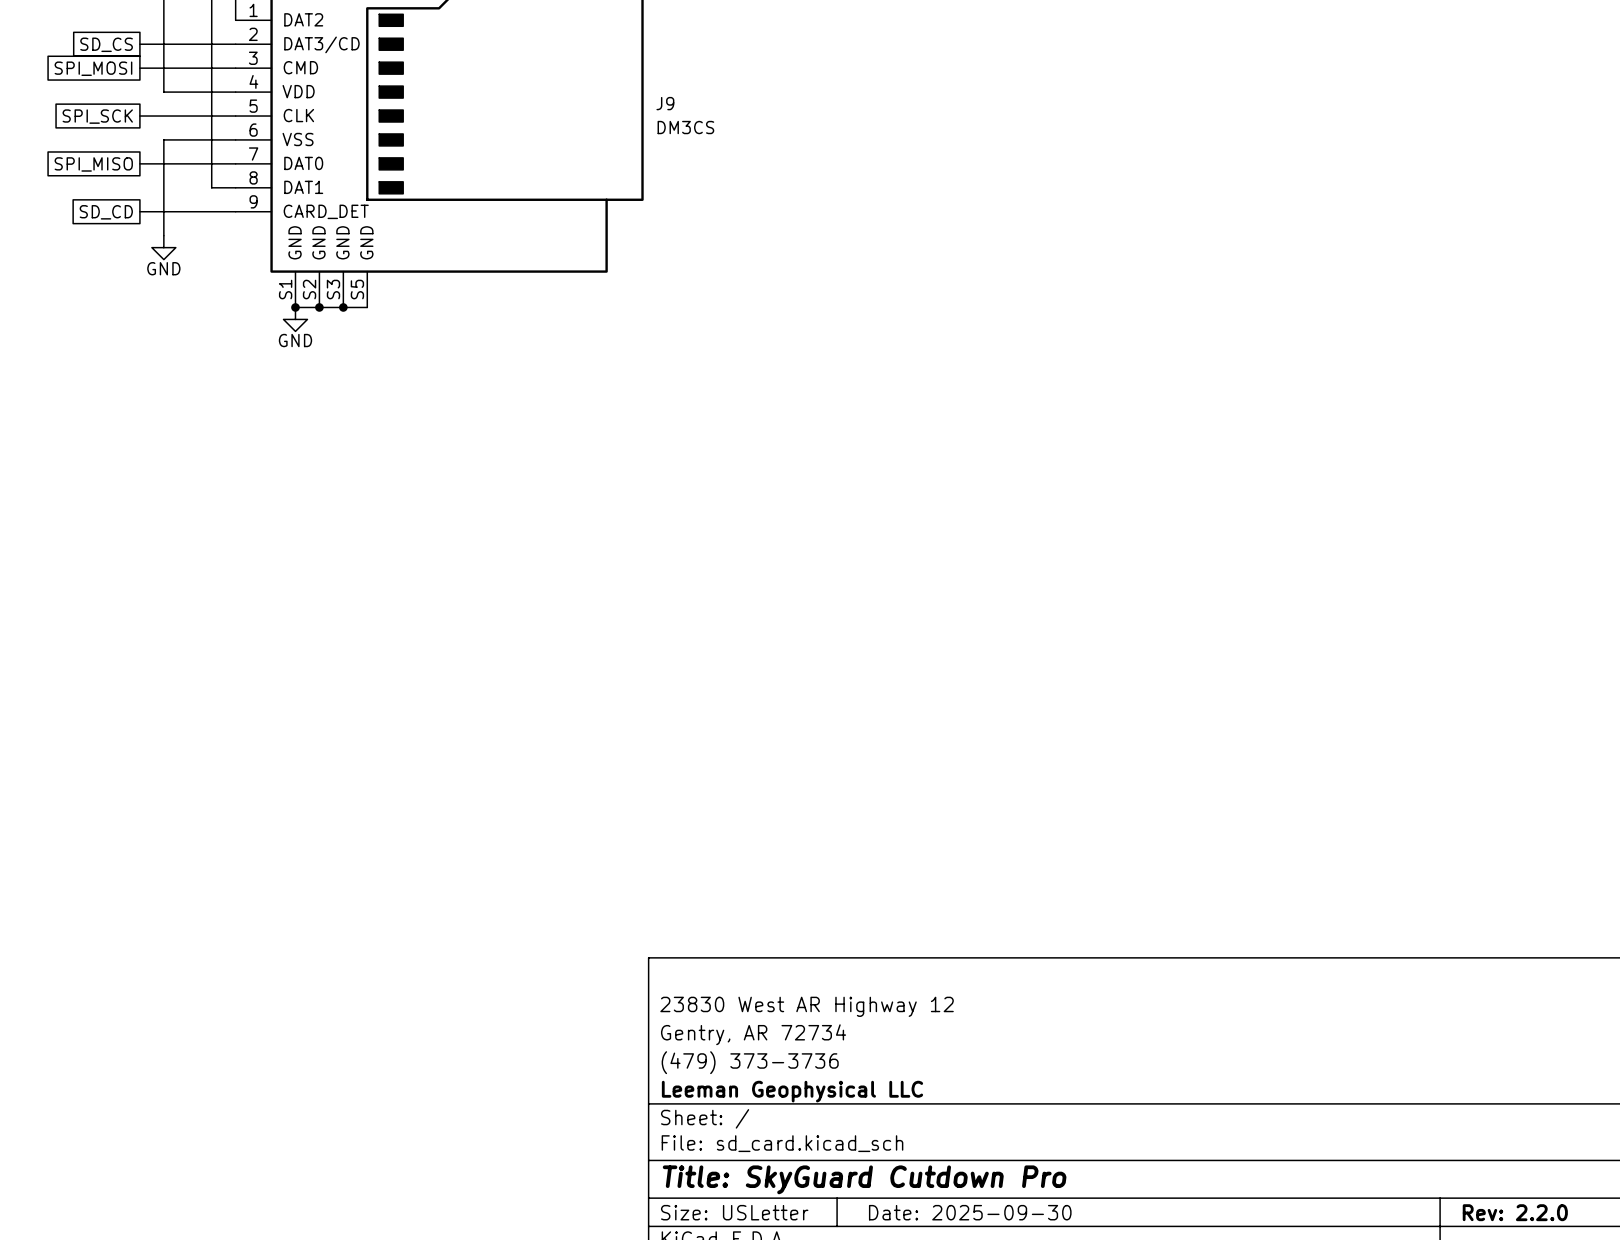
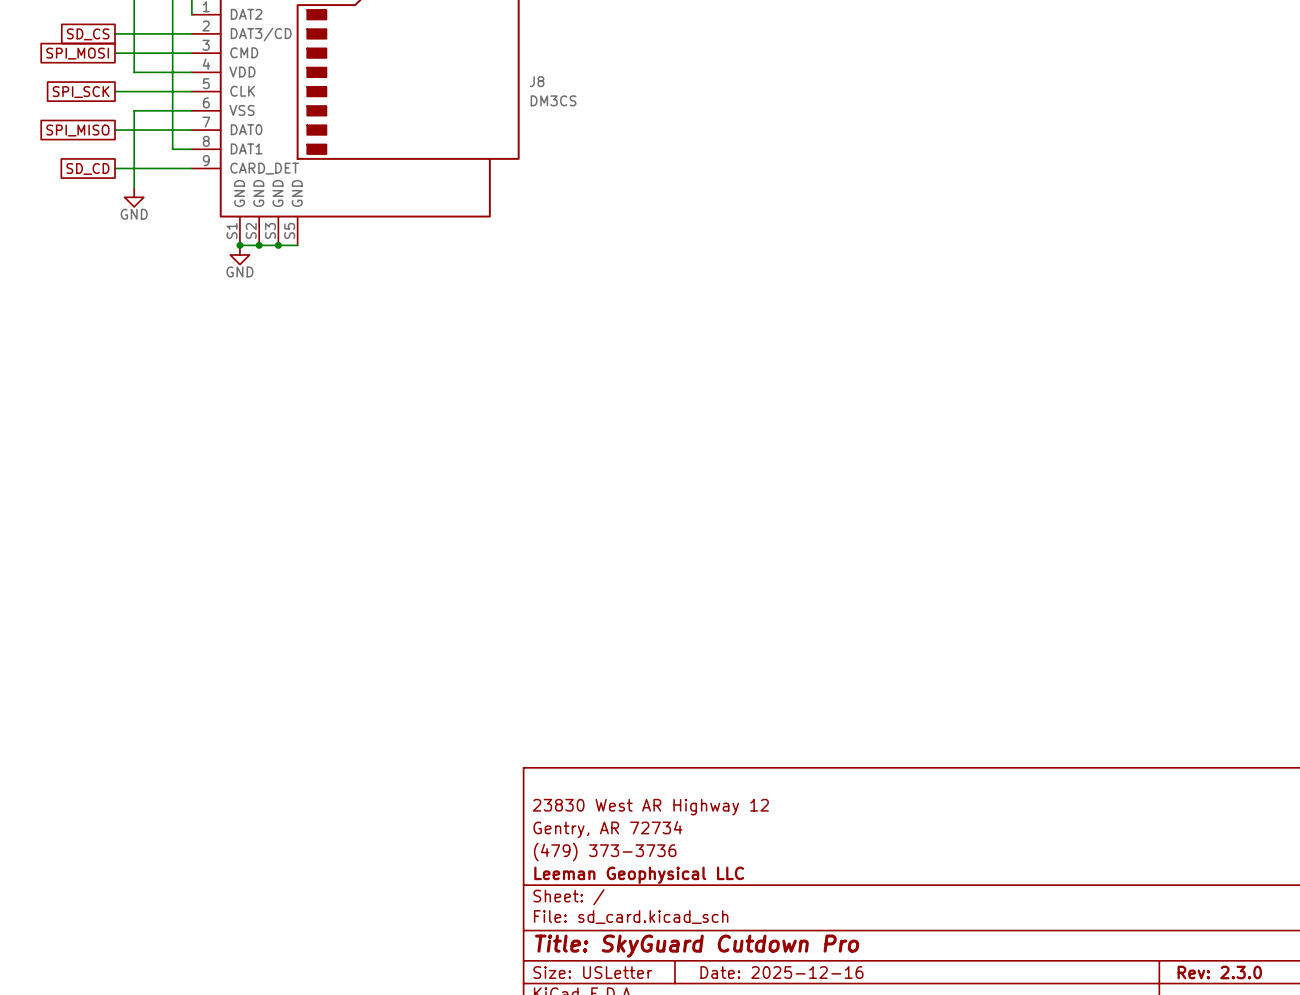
J9 name: J9 (665, 103) -> J8 (537, 81)
title block: Date: 2025-09-30 (970, 1212) -> Date: 2025-12-16 (781, 972)
title block: Rev: 2.2.0 (1515, 1212) -> Rev: 2.3.0 (1219, 972)

